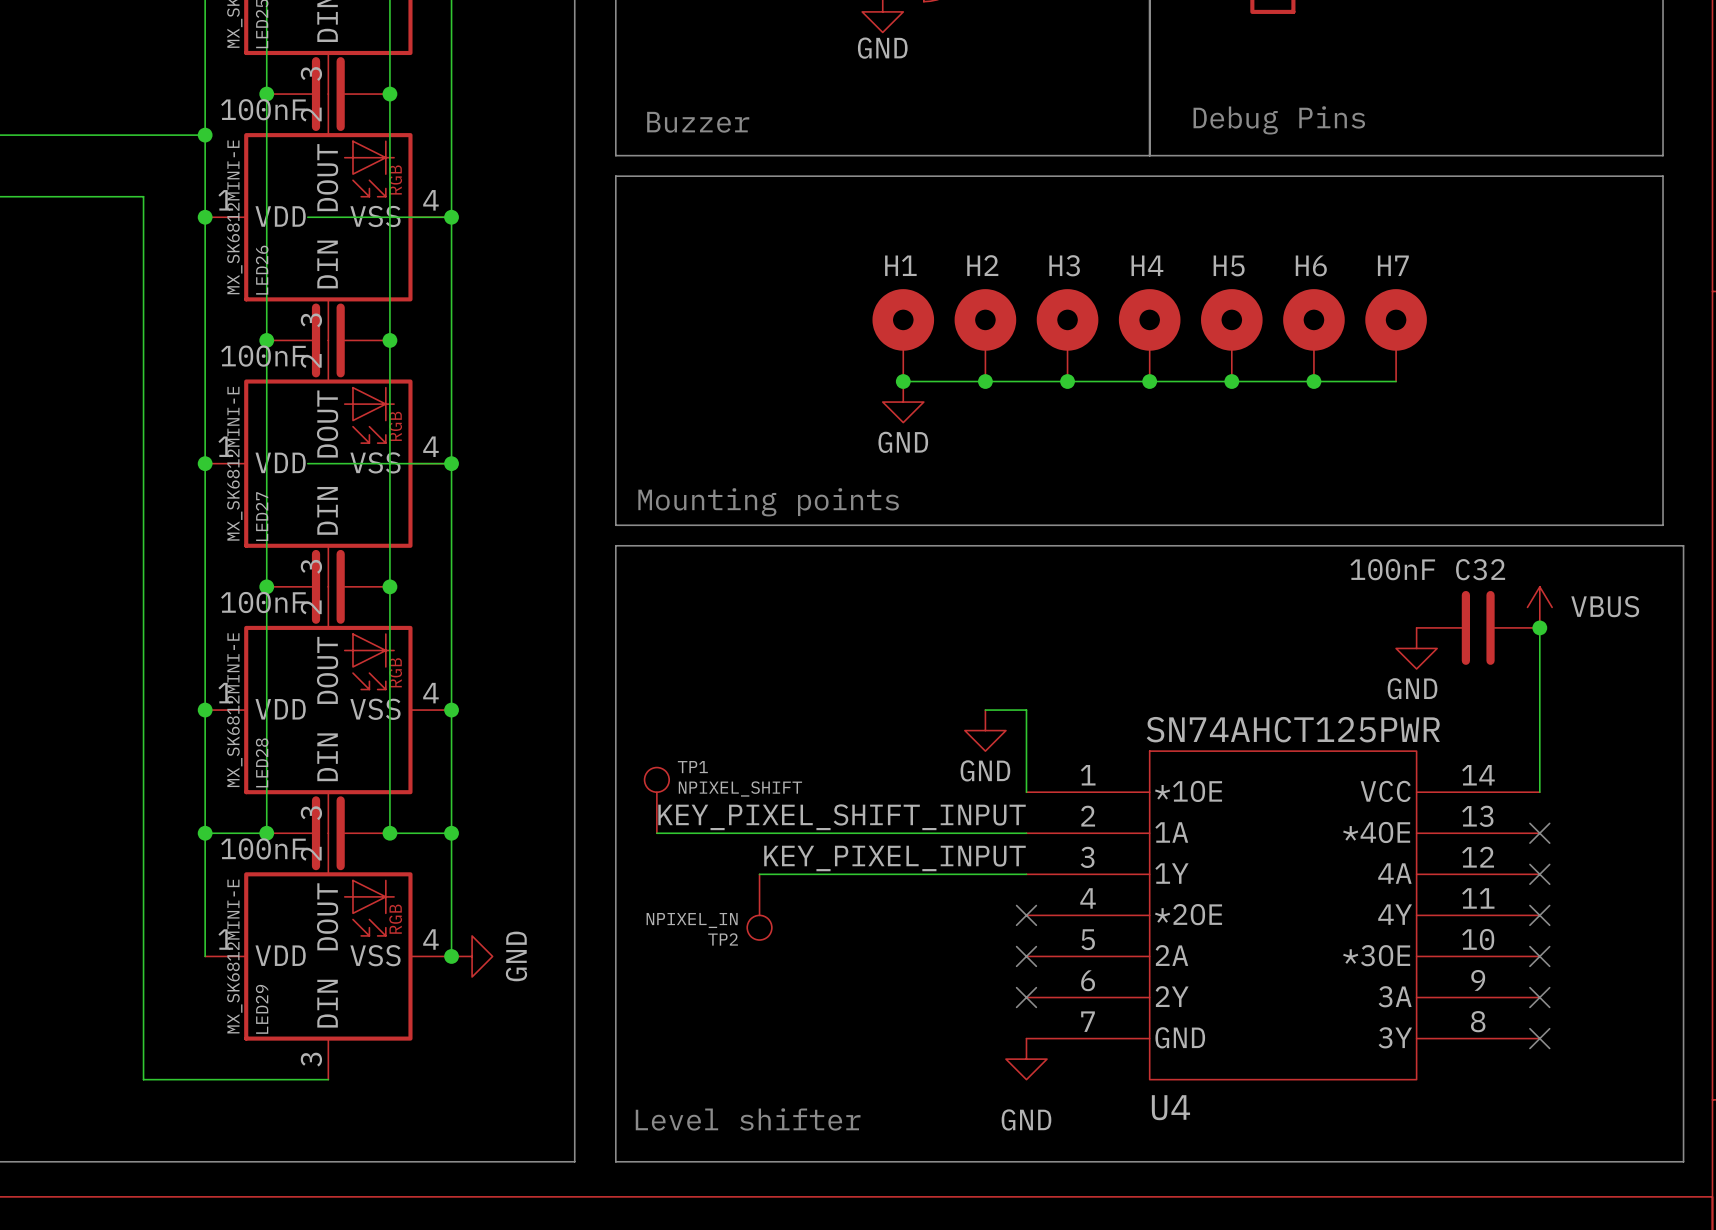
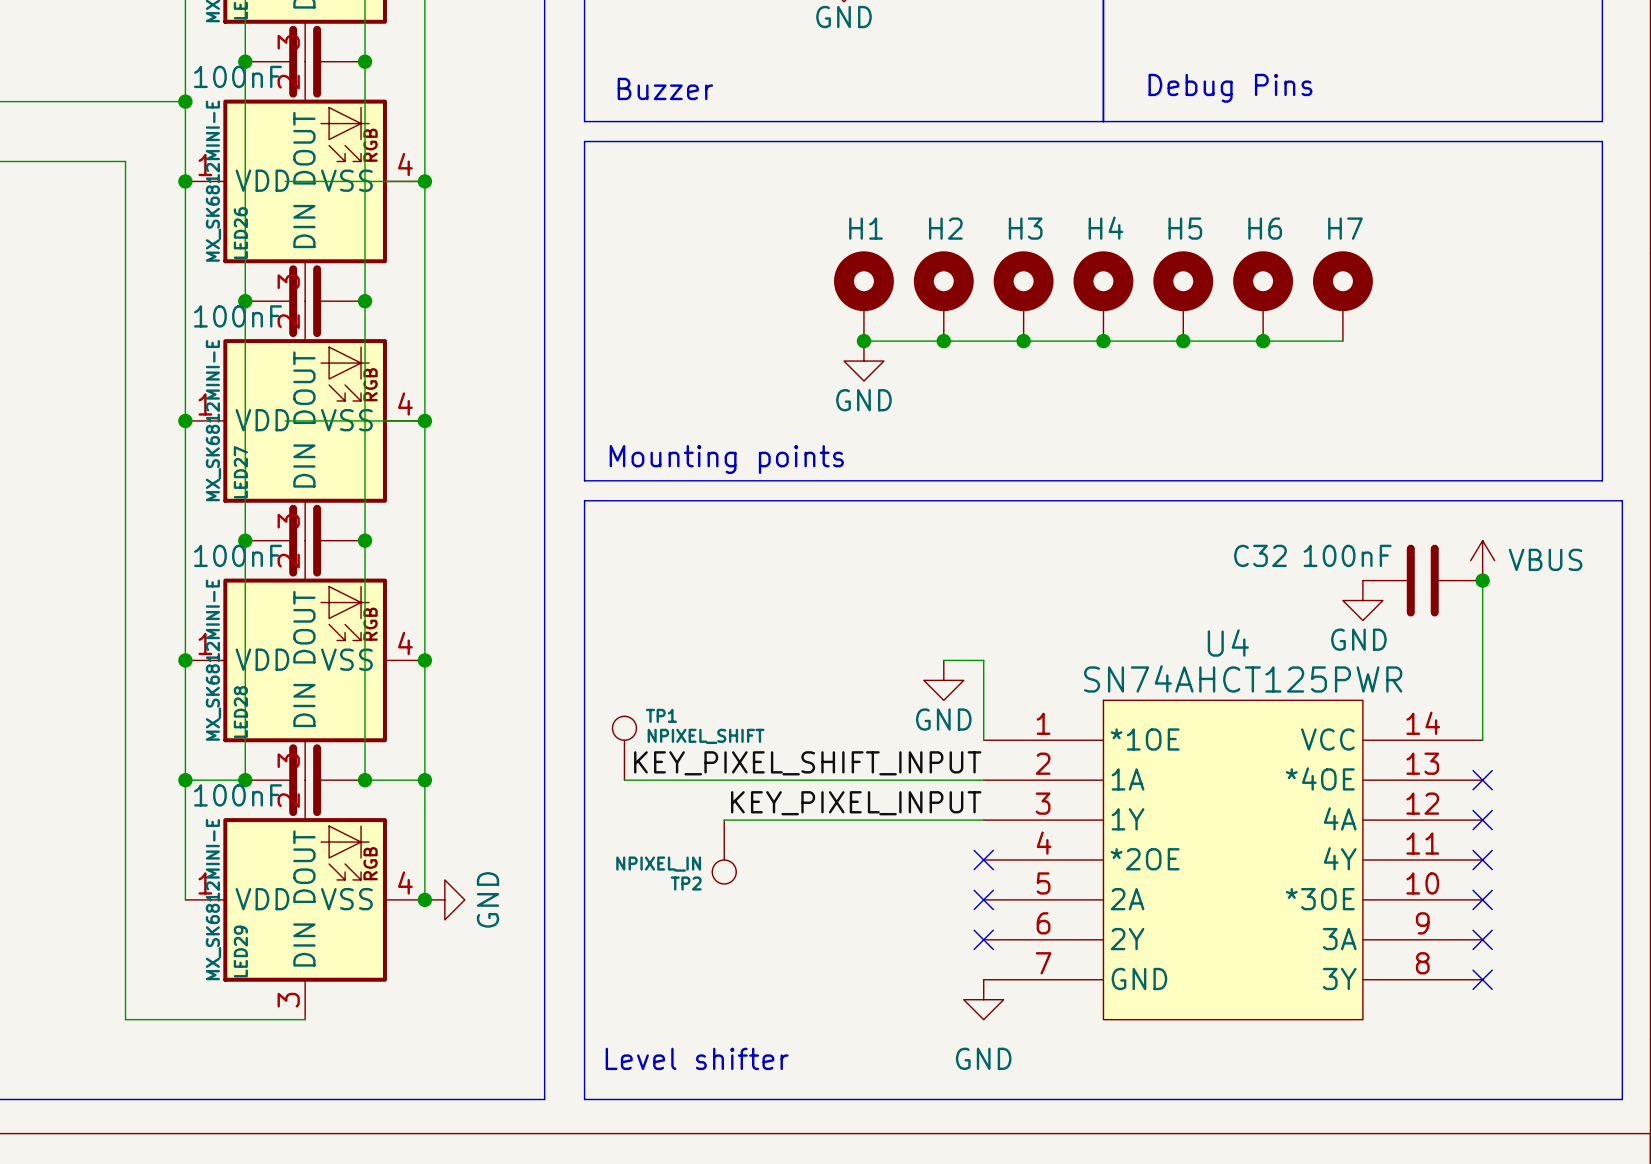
C32 value position: 100nF (1392, 569) -> 100nF (1347, 555)
C32 name position: C32 (1480, 569) -> C32 (1260, 555)
U4 name position: U4 (1170, 1107) -> U4 (1228, 642)

